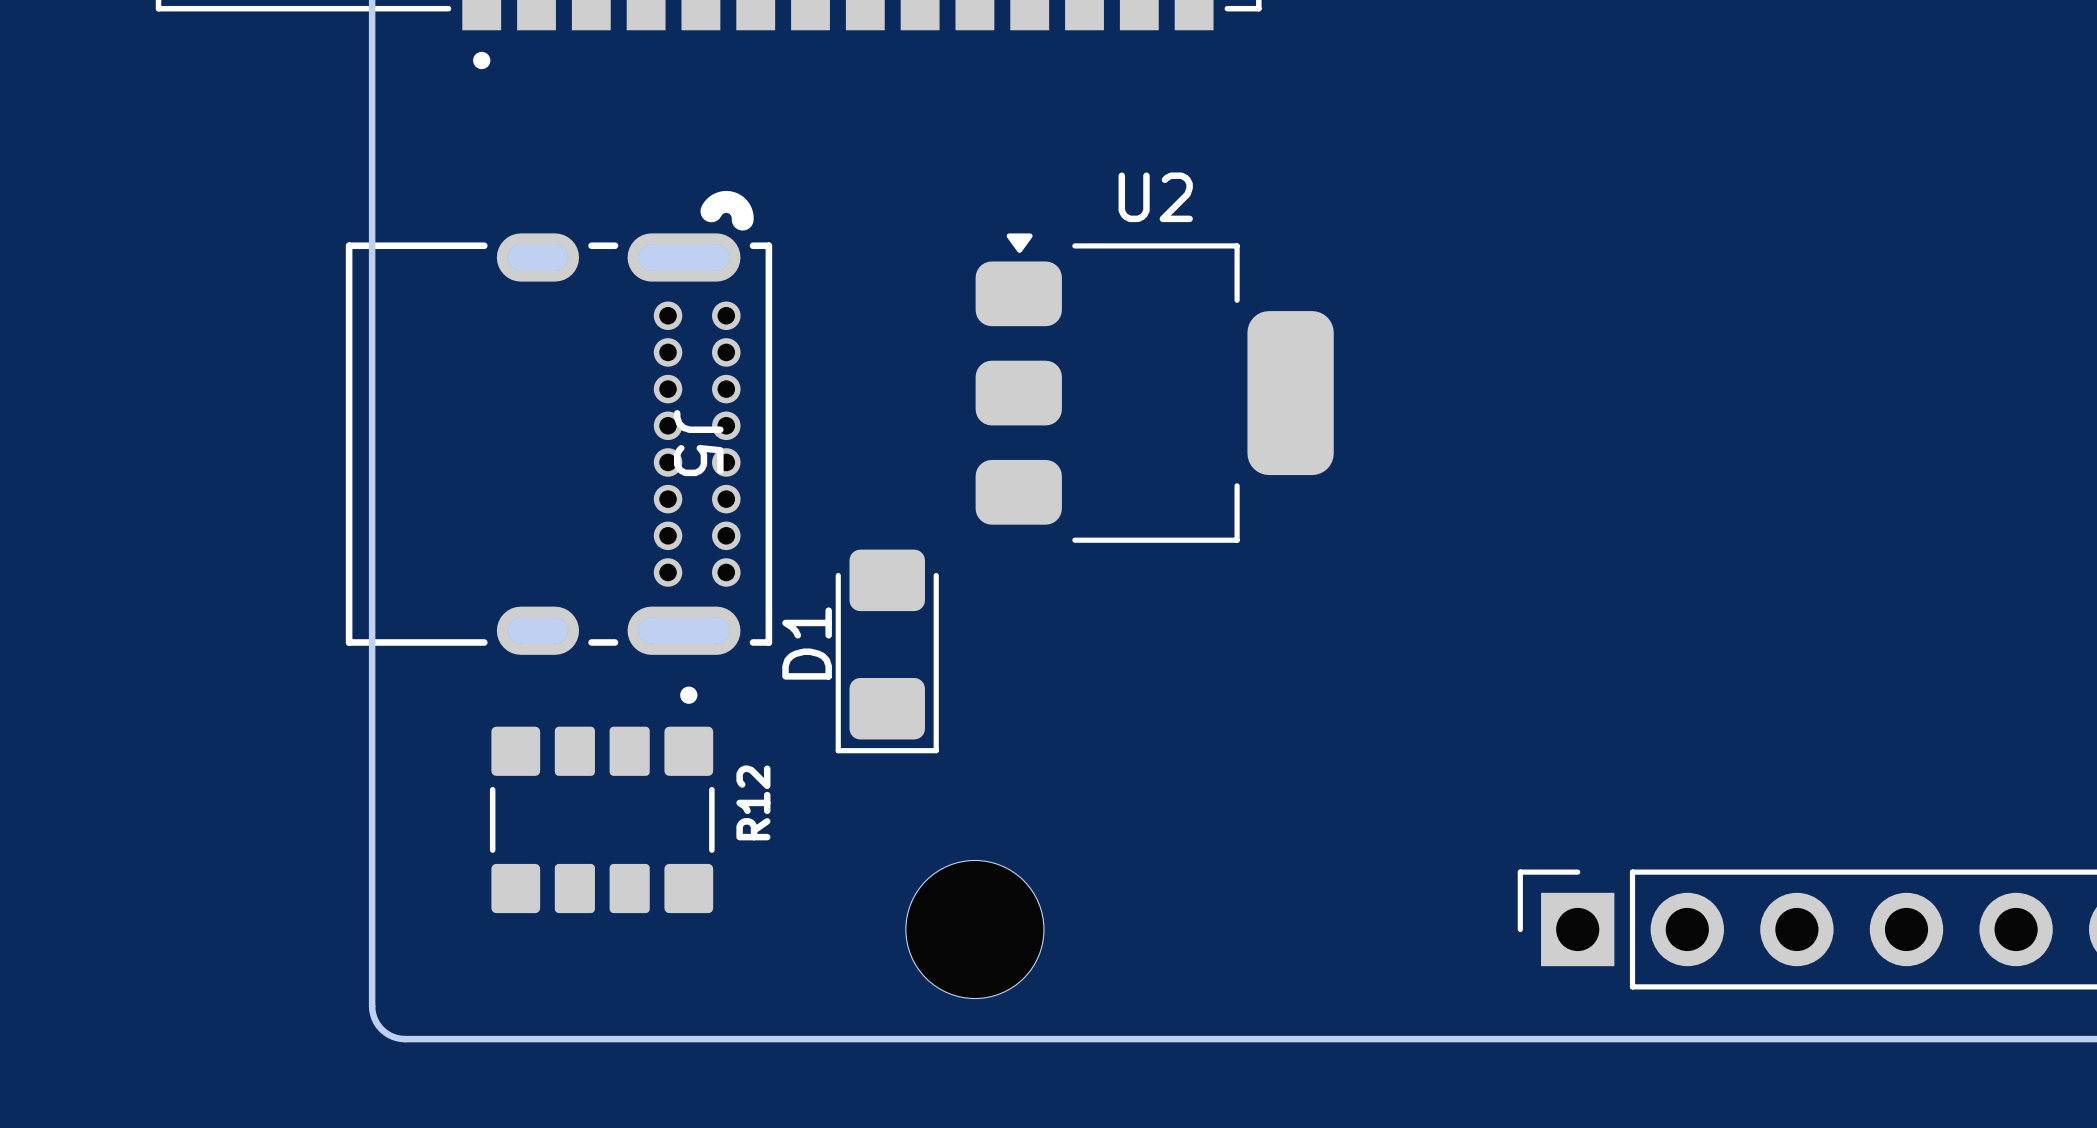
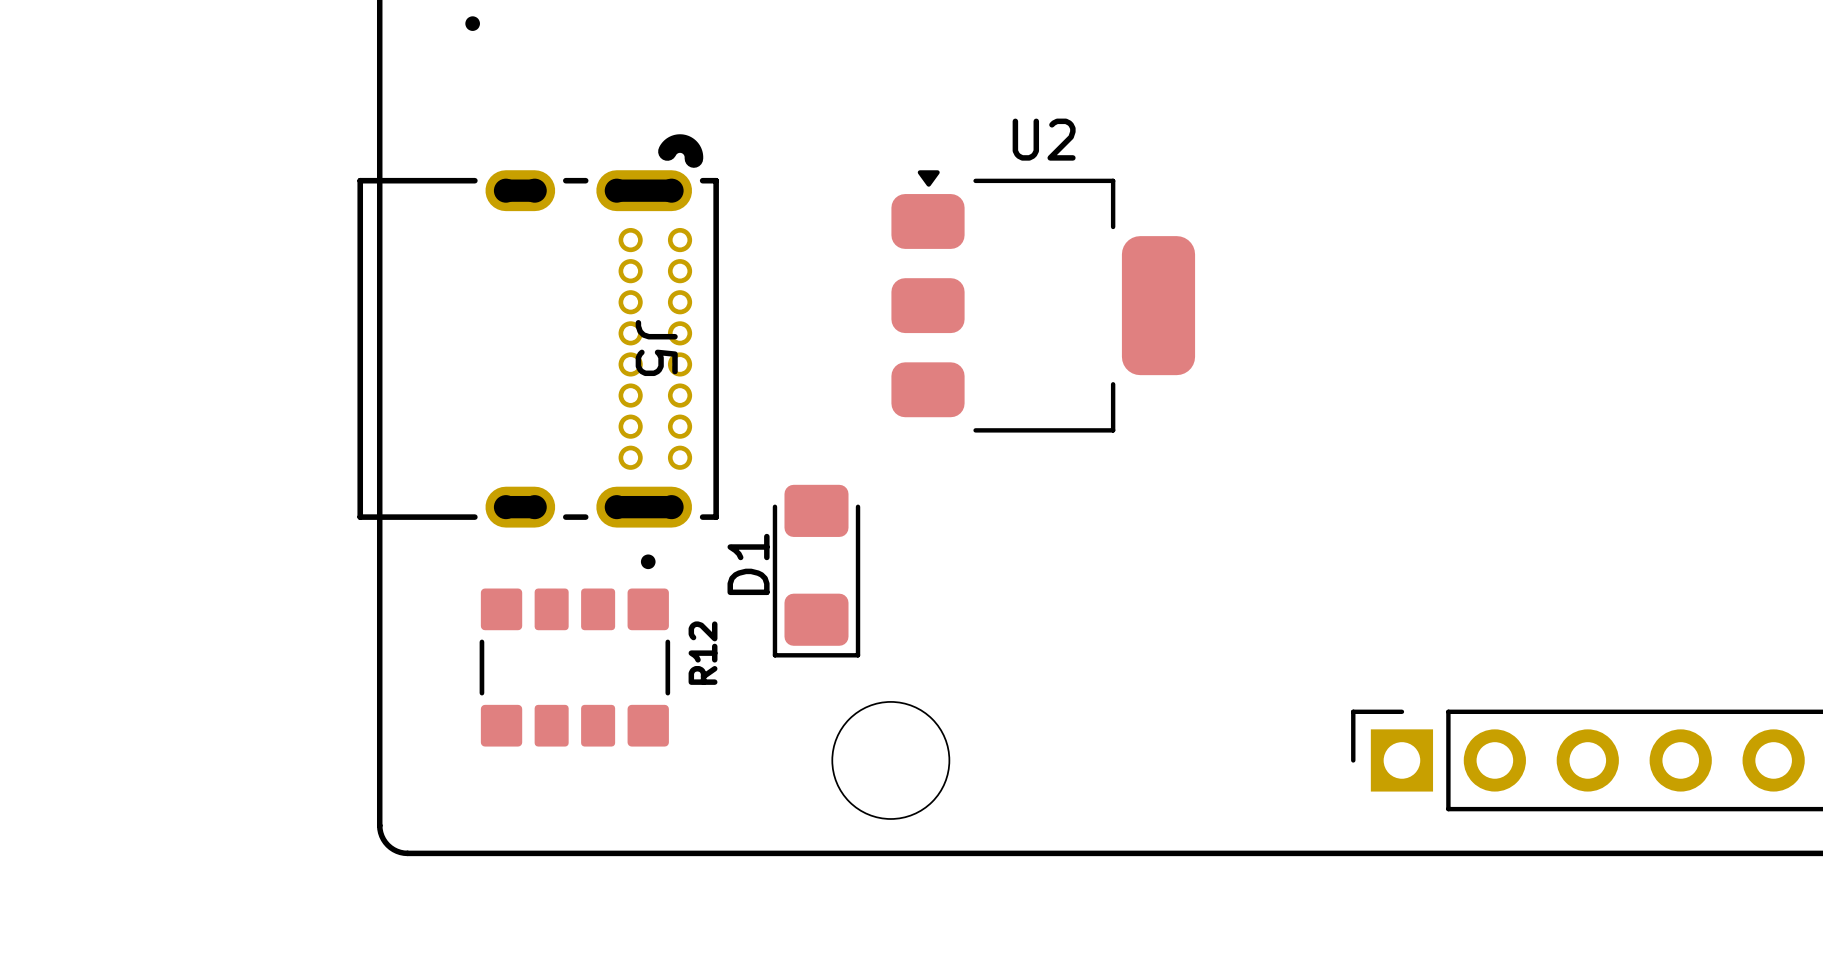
D1 position: (887, 651) -> (816, 571)

